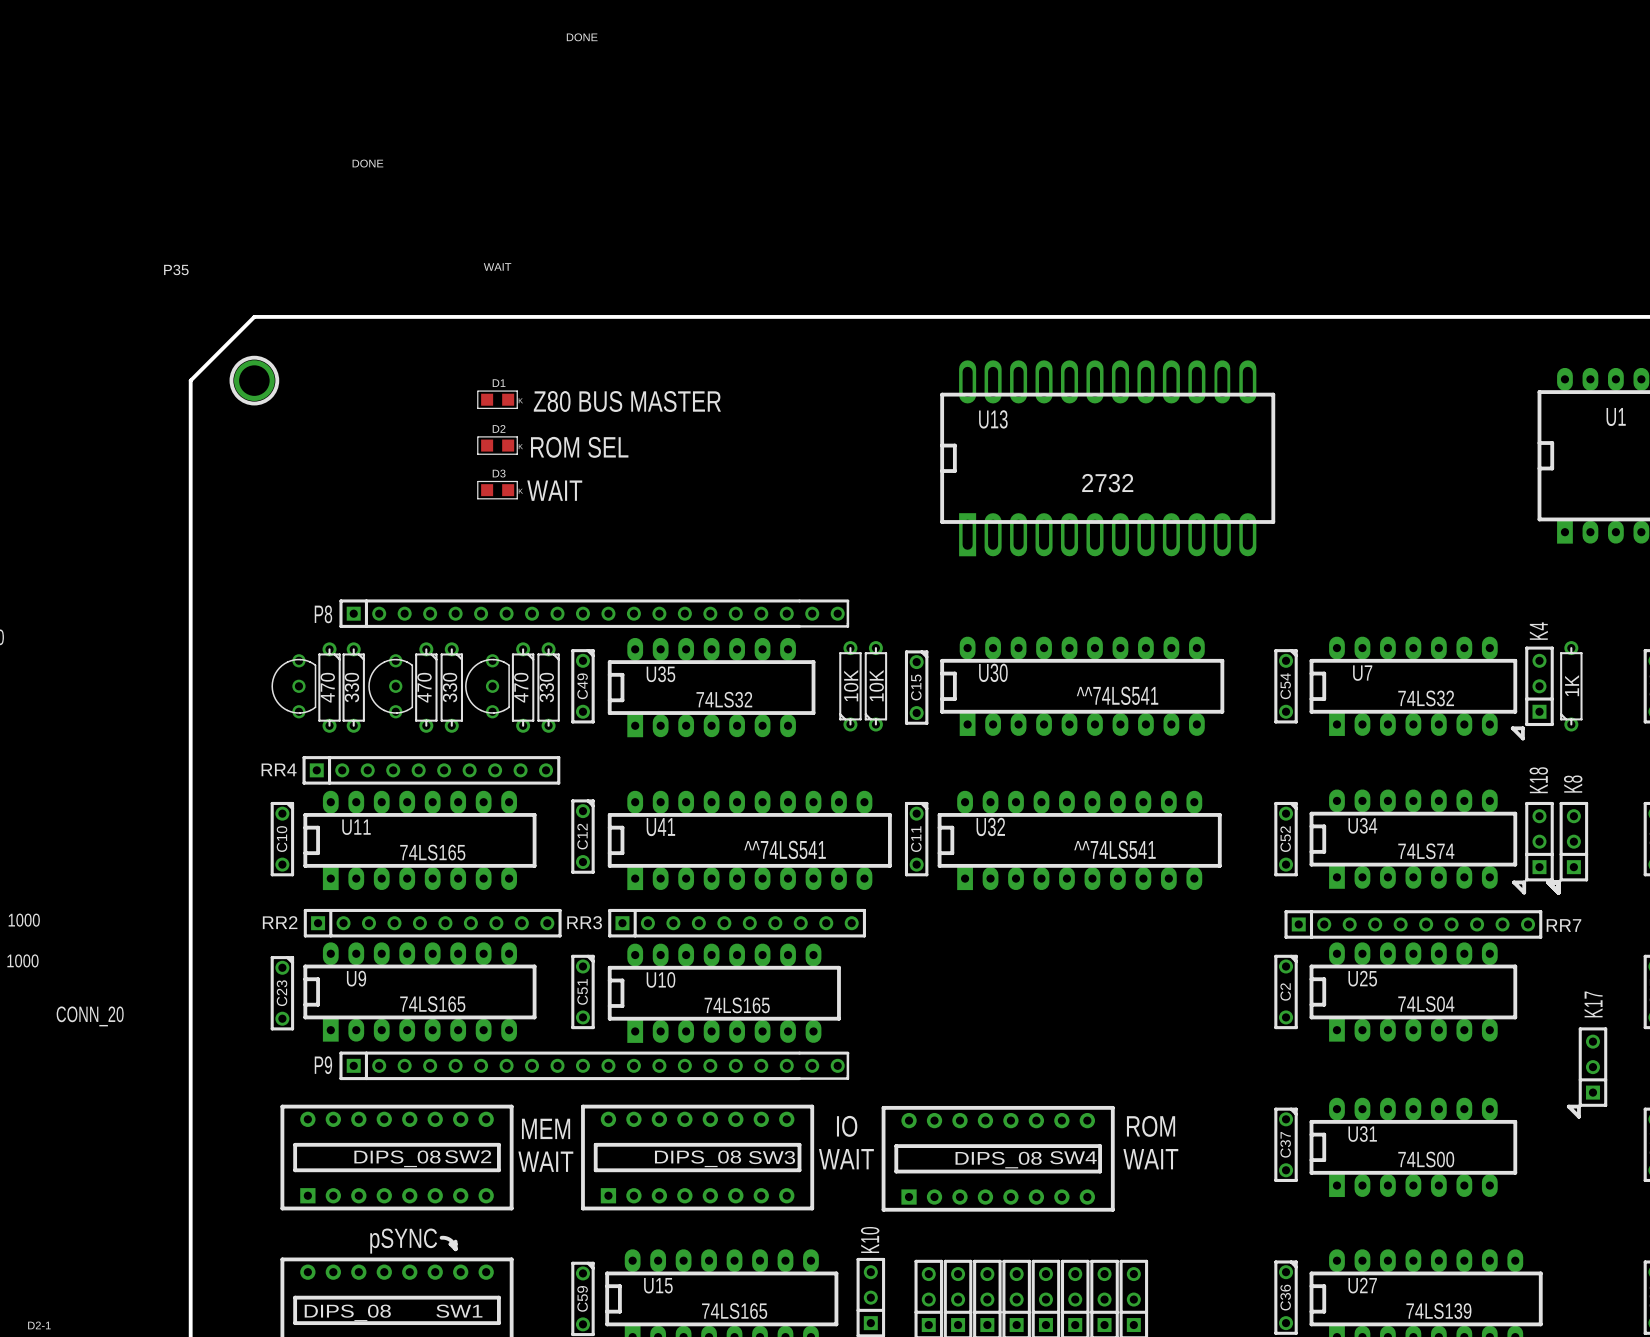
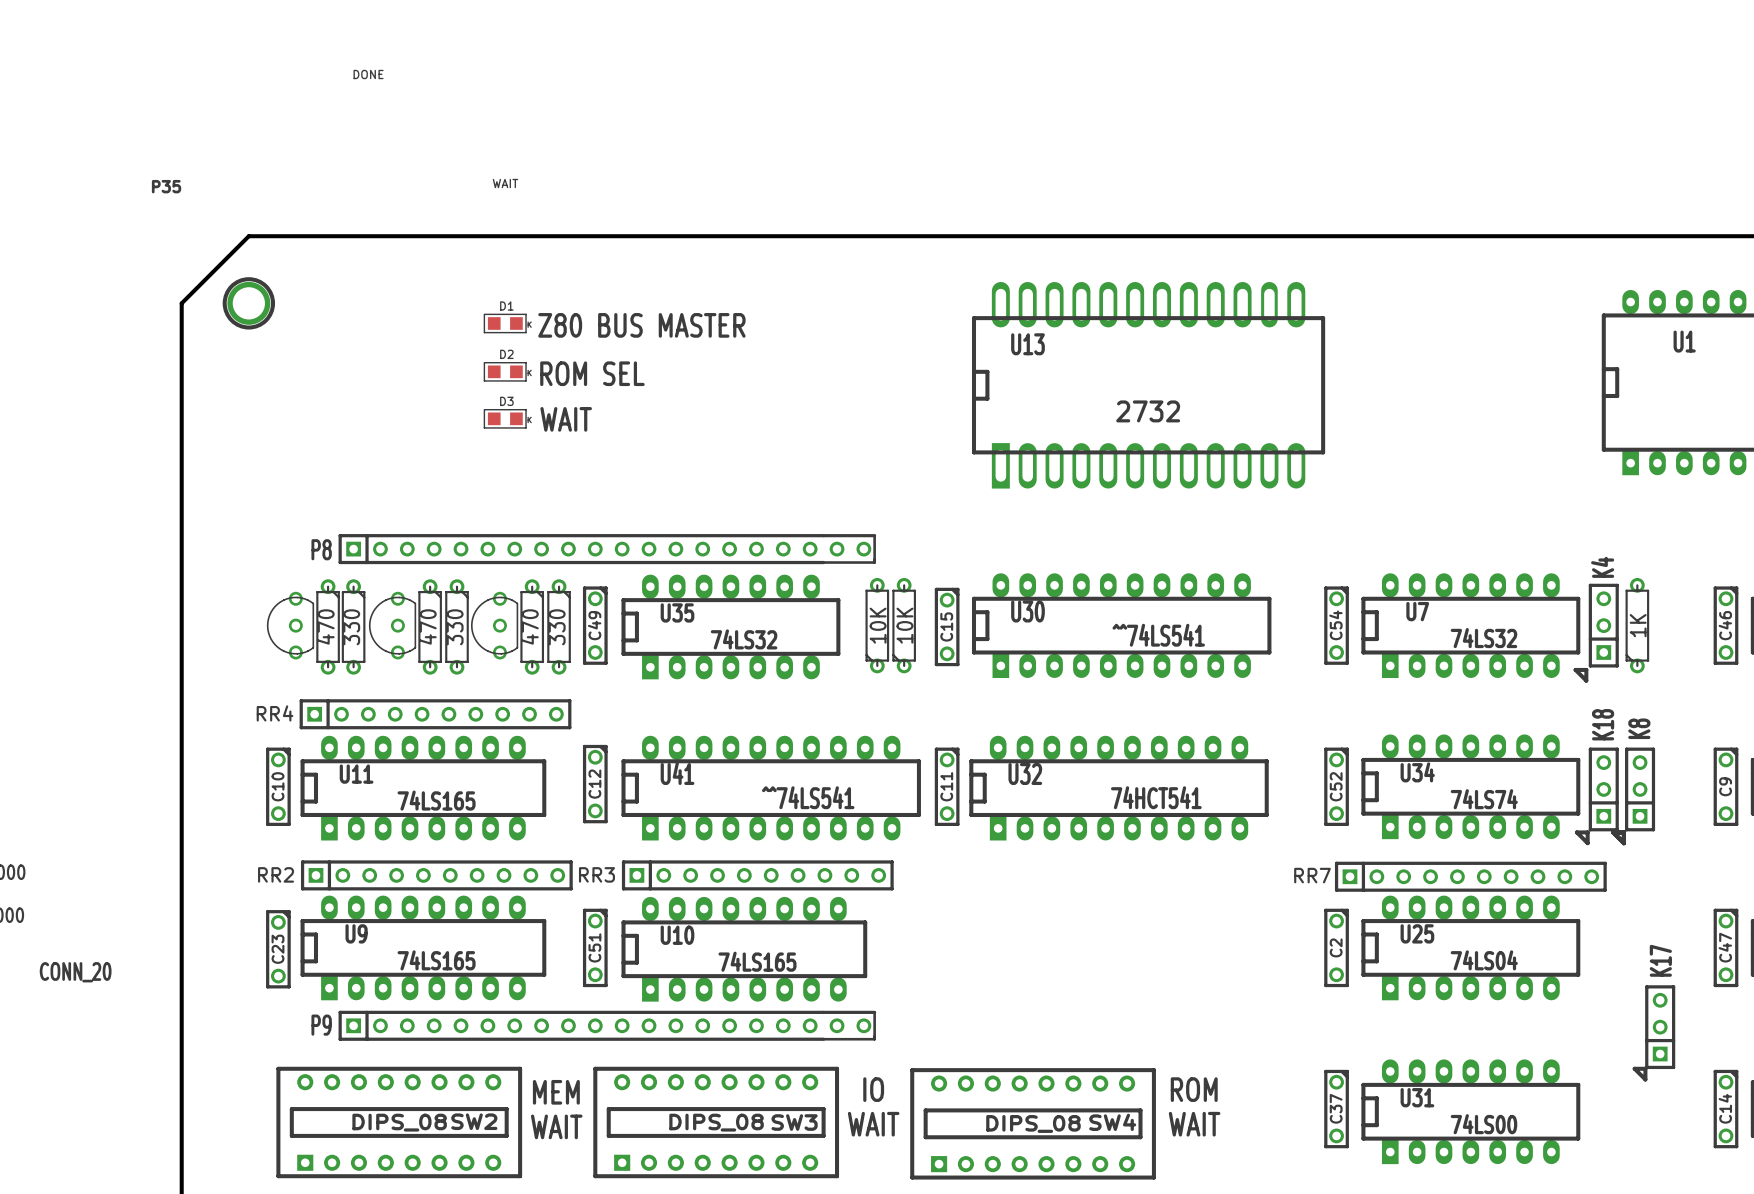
U32 value: ^^74LS541 (1115, 849) -> 74HCT541 (1156, 797)
RR7 name position: RR7 (1563, 925) -> RR7 (1312, 875)

